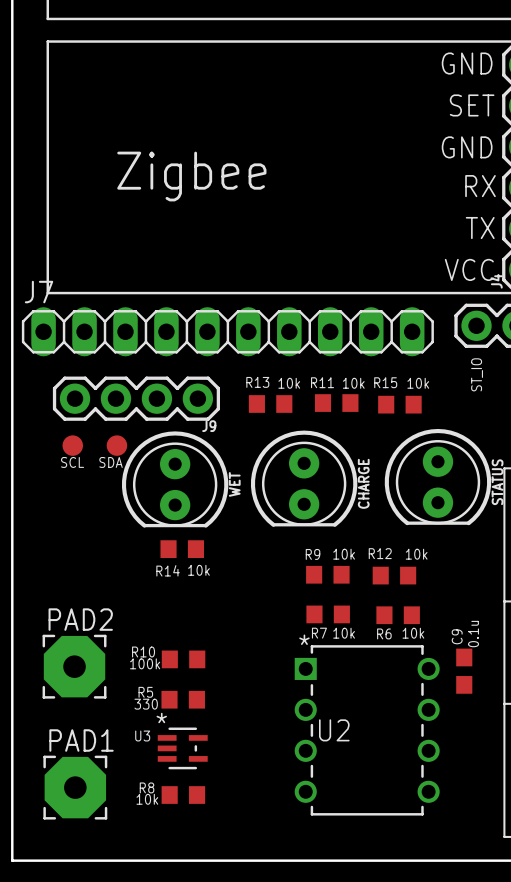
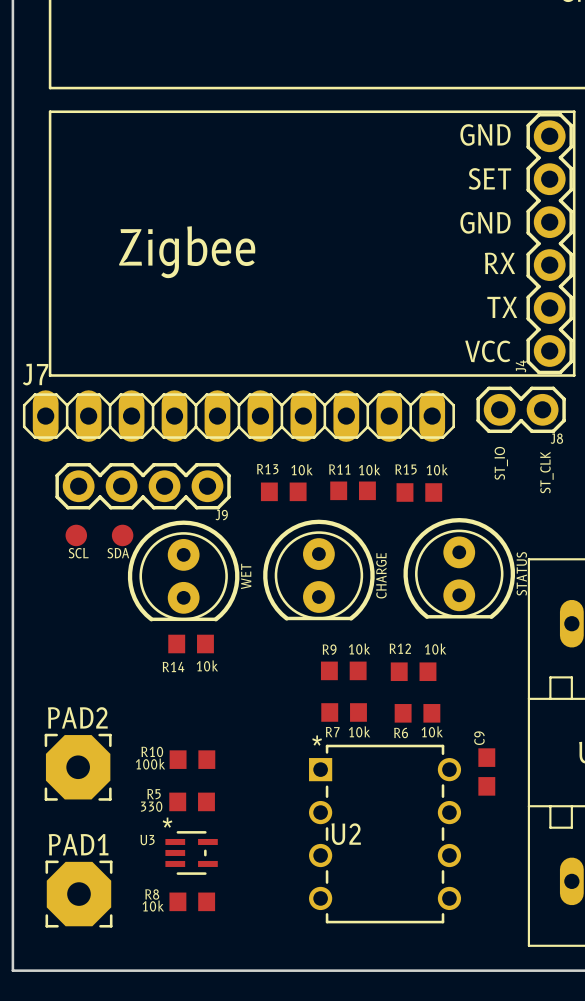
text: 0.1u (473, 634) -> none

